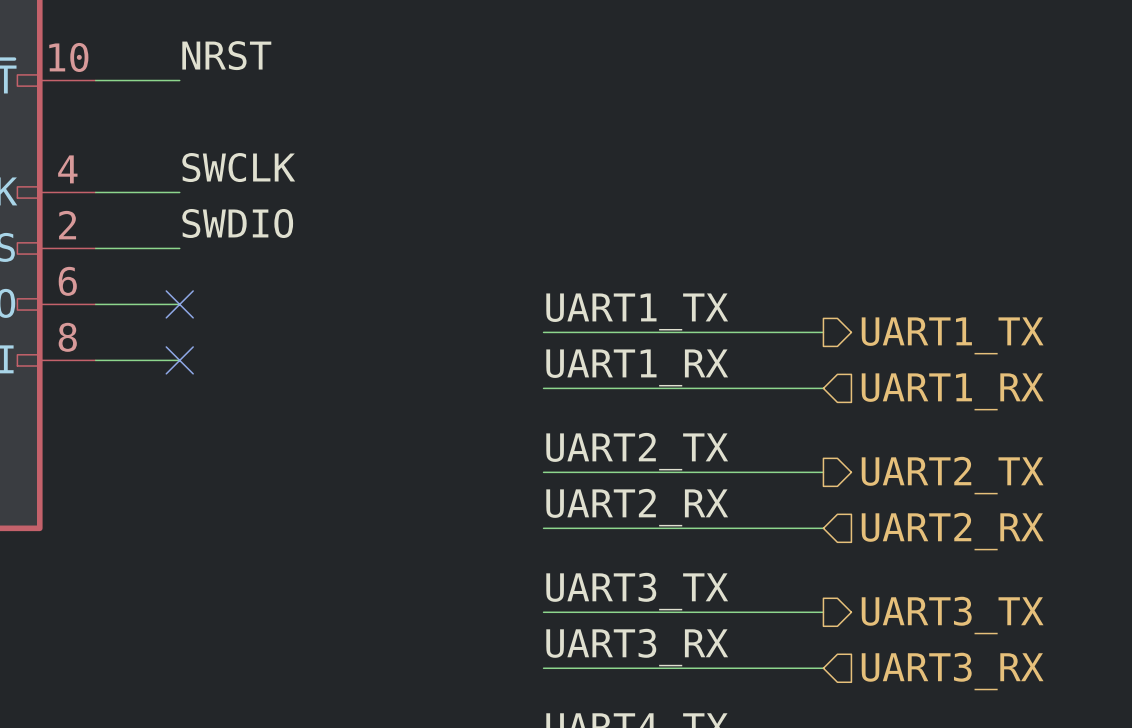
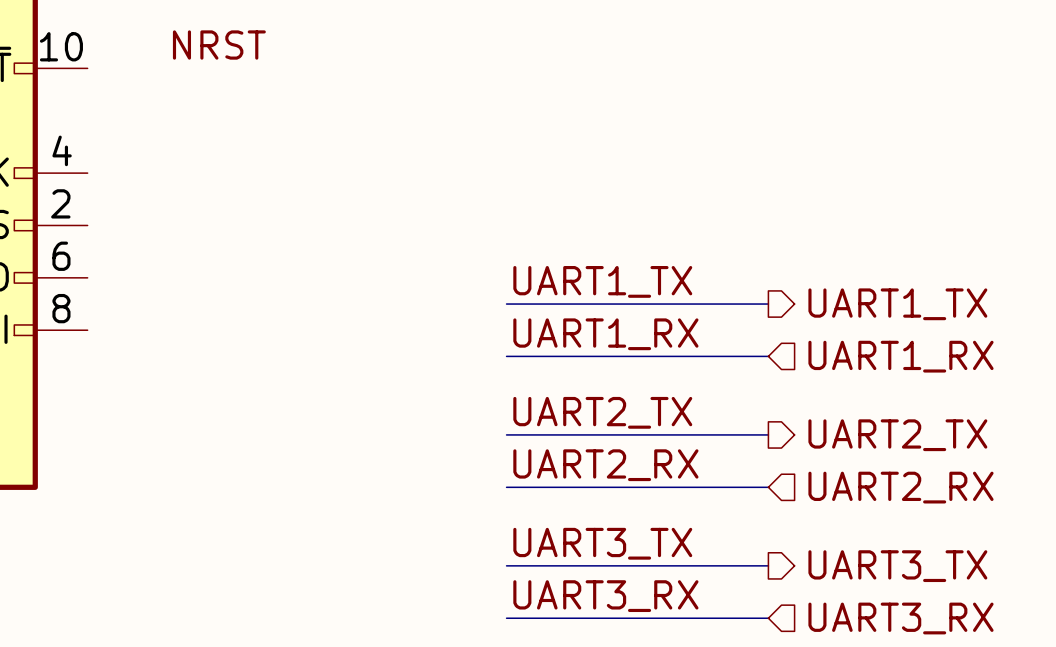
wire: (95, 80) (179, 80) -> none
label: SWCLK (238, 167) -> none
wire: (95, 192) (179, 192) -> none
label: SWDIO (237, 223) -> none
wire: (95, 248) (179, 248) -> none
wire: (95, 304) (179, 304) -> none
no-connect mark: (179, 304) -> none
wire: (95, 360) (179, 360) -> none
no-connect mark: (179, 360) -> none

